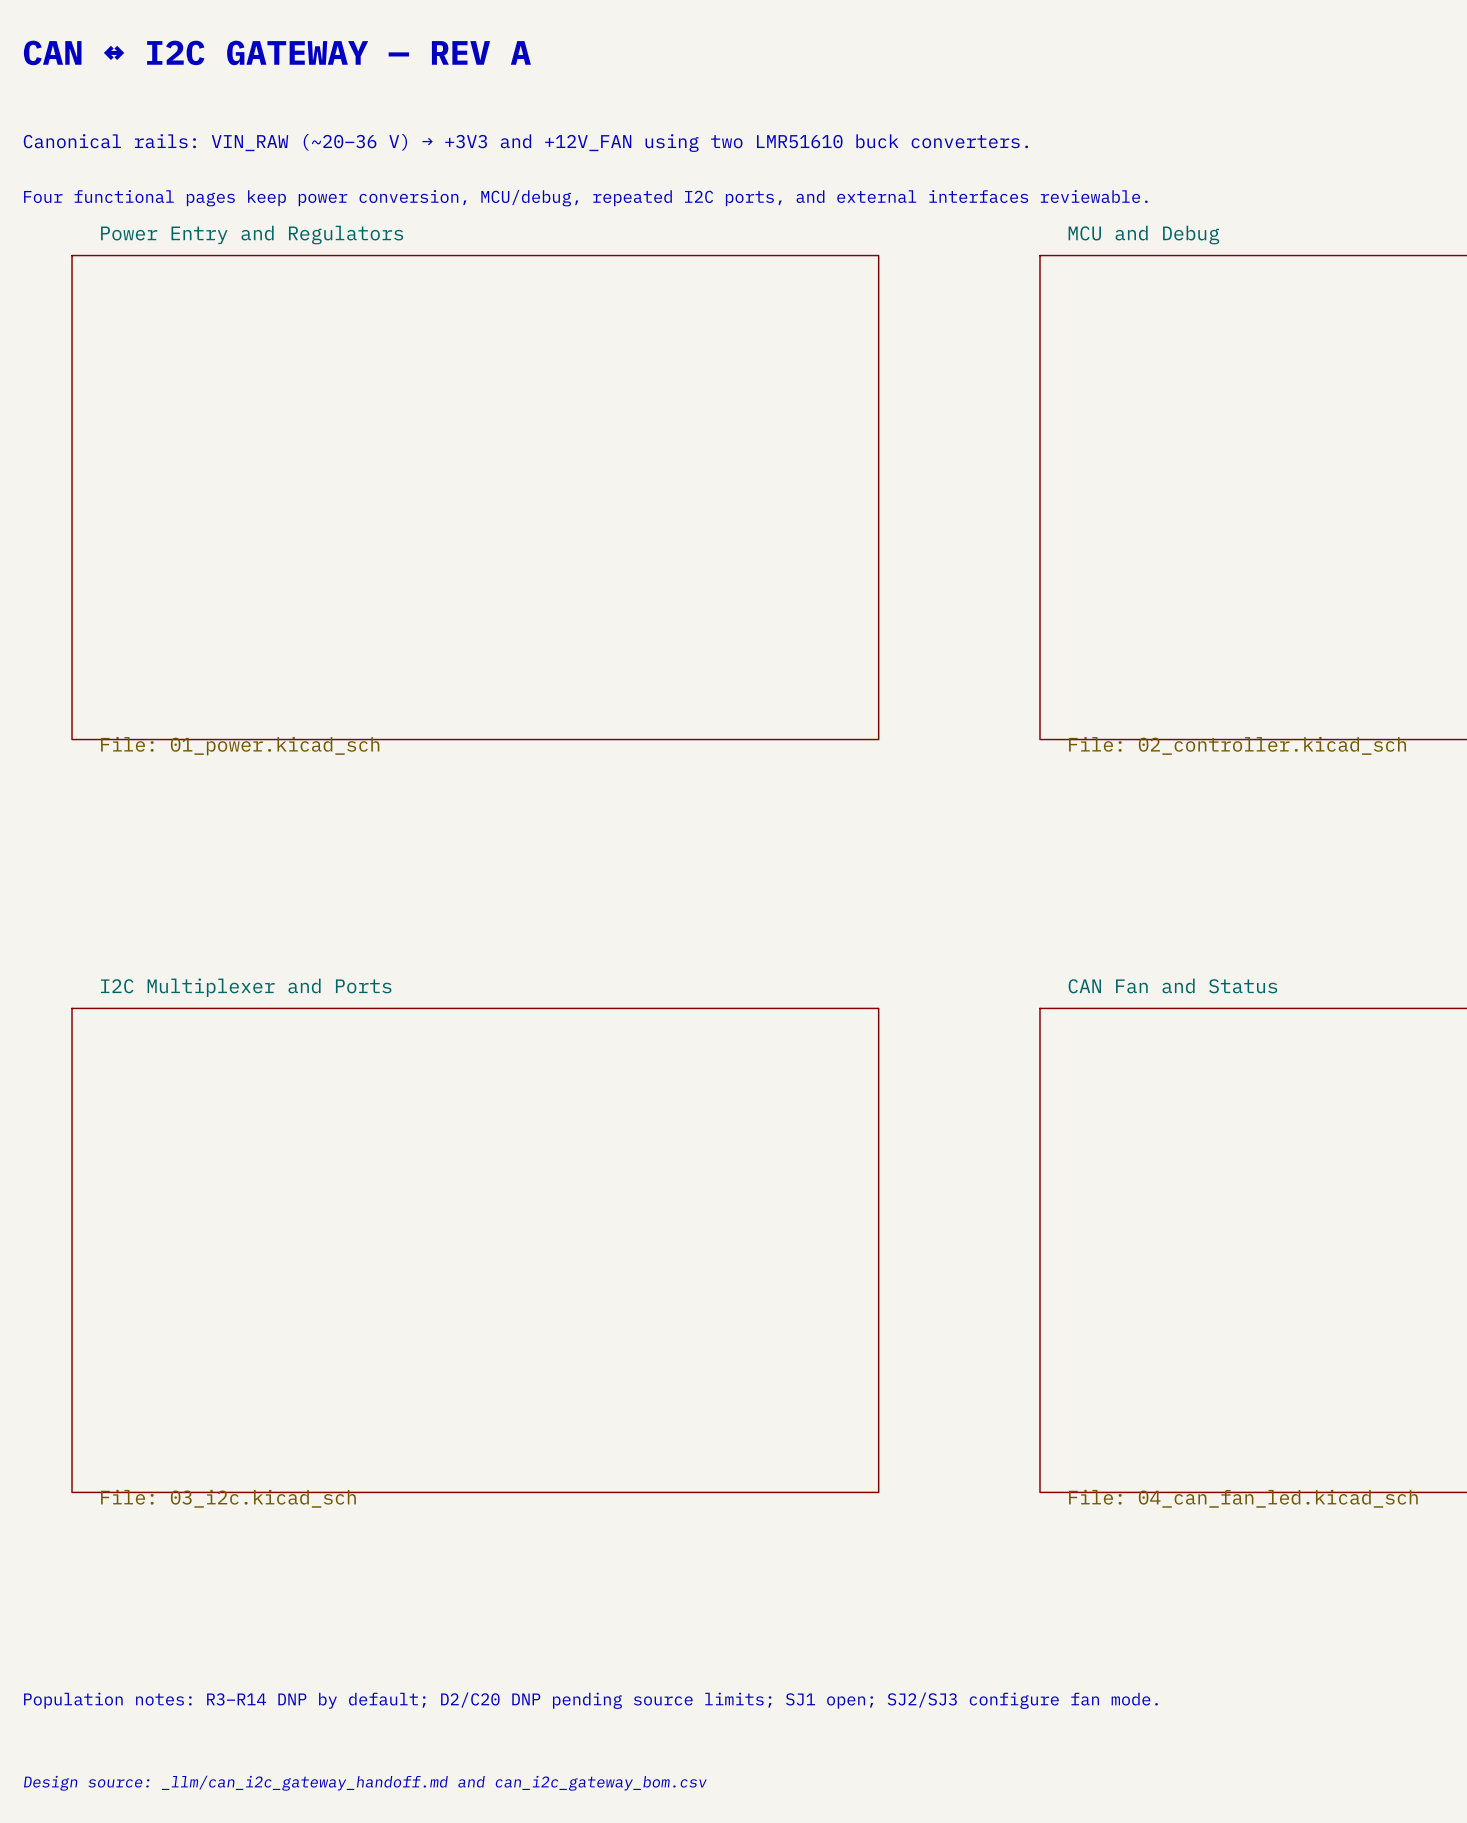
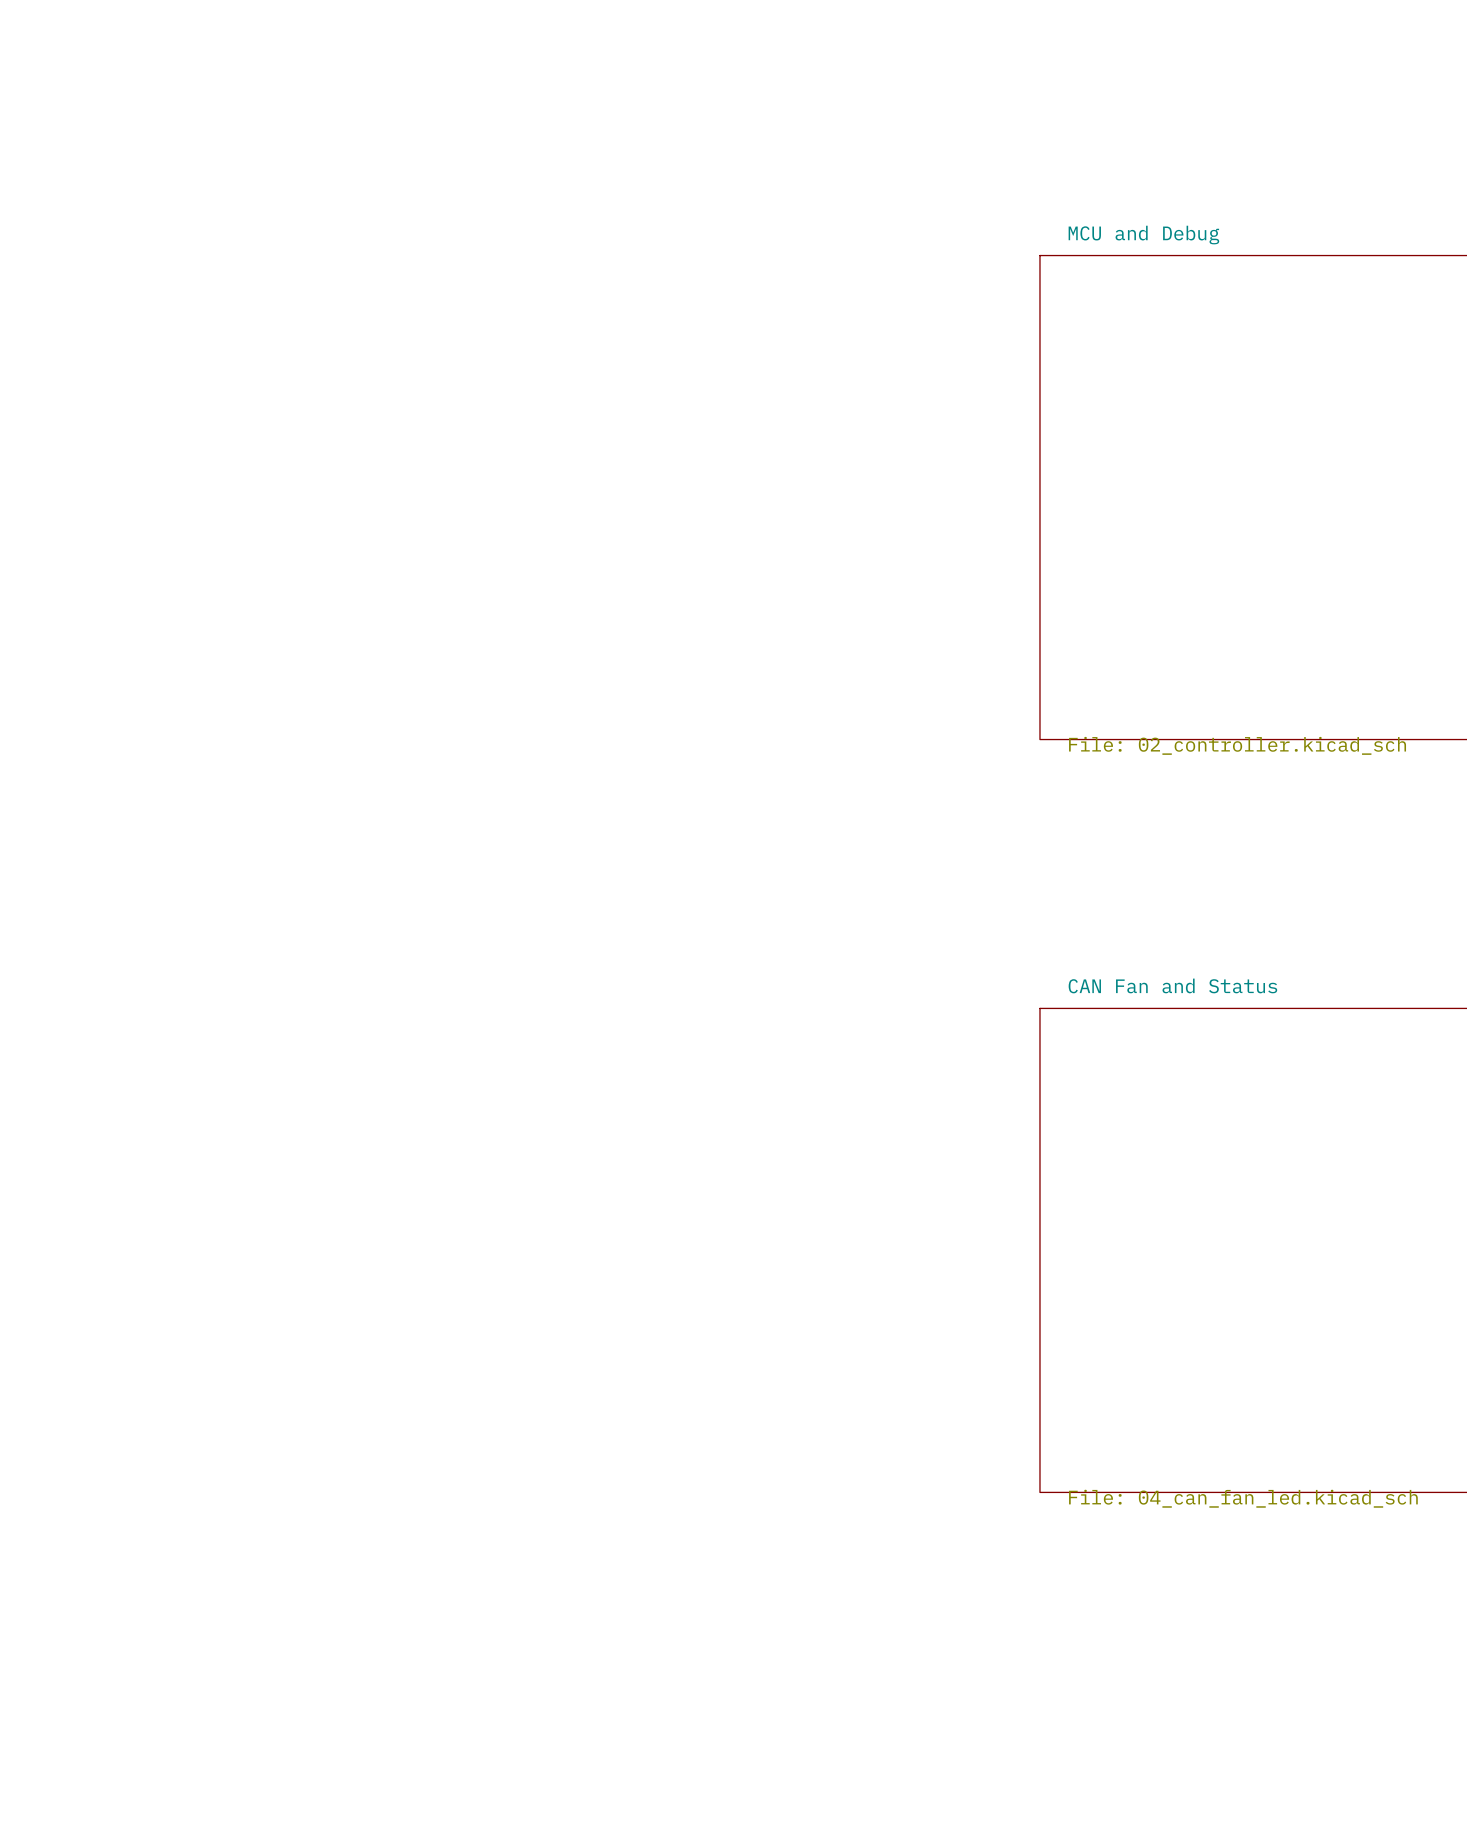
text: CAN ↔ I2C GATEWAY — REV A (277, 52) -> none
text: Canonical rails: VIN_RAW (~20–36 V) → +3V3 and +12V_FAN using two LMR51610 buck converters. (525, 142) -> none
text: Four functional pages keep power conversion, MCU/debug, repeated I2C ports, and external interfaces reviewable. (585, 198) -> none
sheet Power Entry and Regulators: File: 01_power.kicad_sch (475, 497) -> none
sheet I2C Multiplexer and Ports: File: 03_i2c.kicad_sch (475, 1250) -> none
text: Population notes: R3–R14 DNP by default; D2/C20 DNP pending source limits; SJ1 open; SJ2/SJ3 configure fan mode. (590, 1700) -> none
text: Design source: _llm/can_i2c_gateway_handoff.md and can_i2c_gateway_bom.csv (365, 1783) -> none

